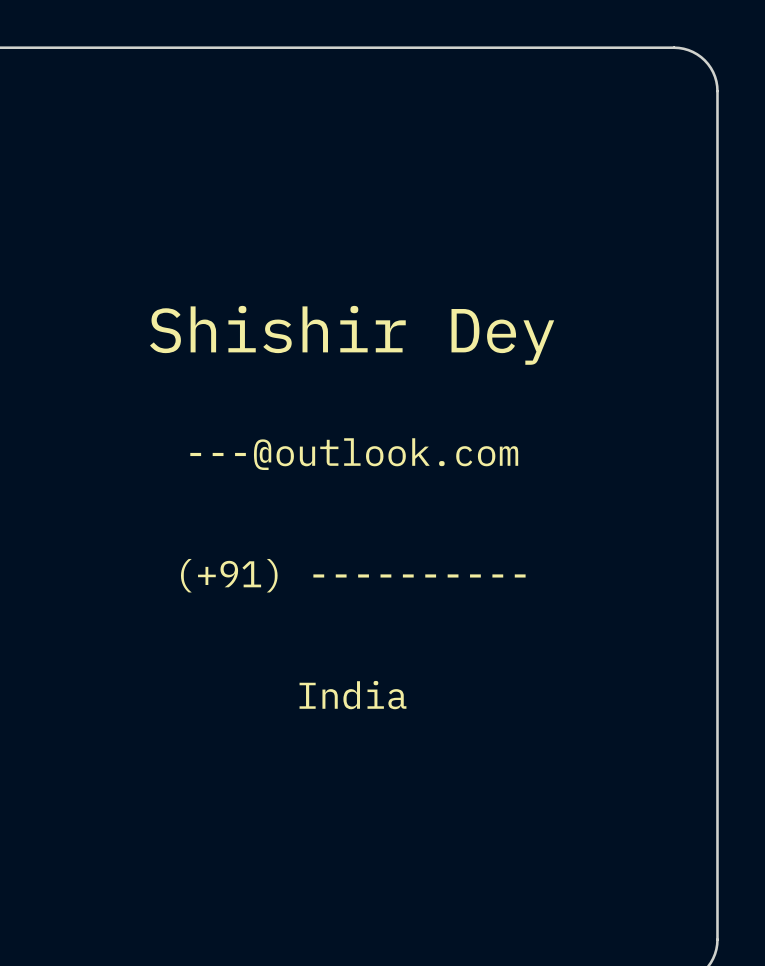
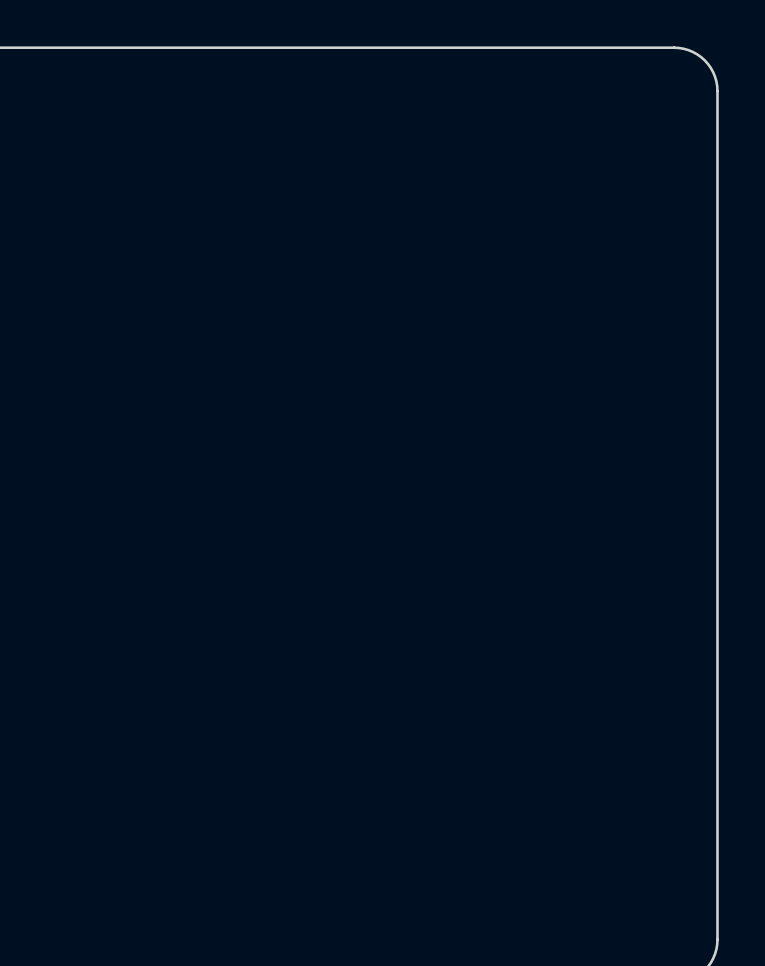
text: Shishir Dey (352, 335) -> none
text: ---@outlook.com (354, 454) -> none
text: (+91) ---------- (353, 575) -> none
text: India (352, 695) -> none

